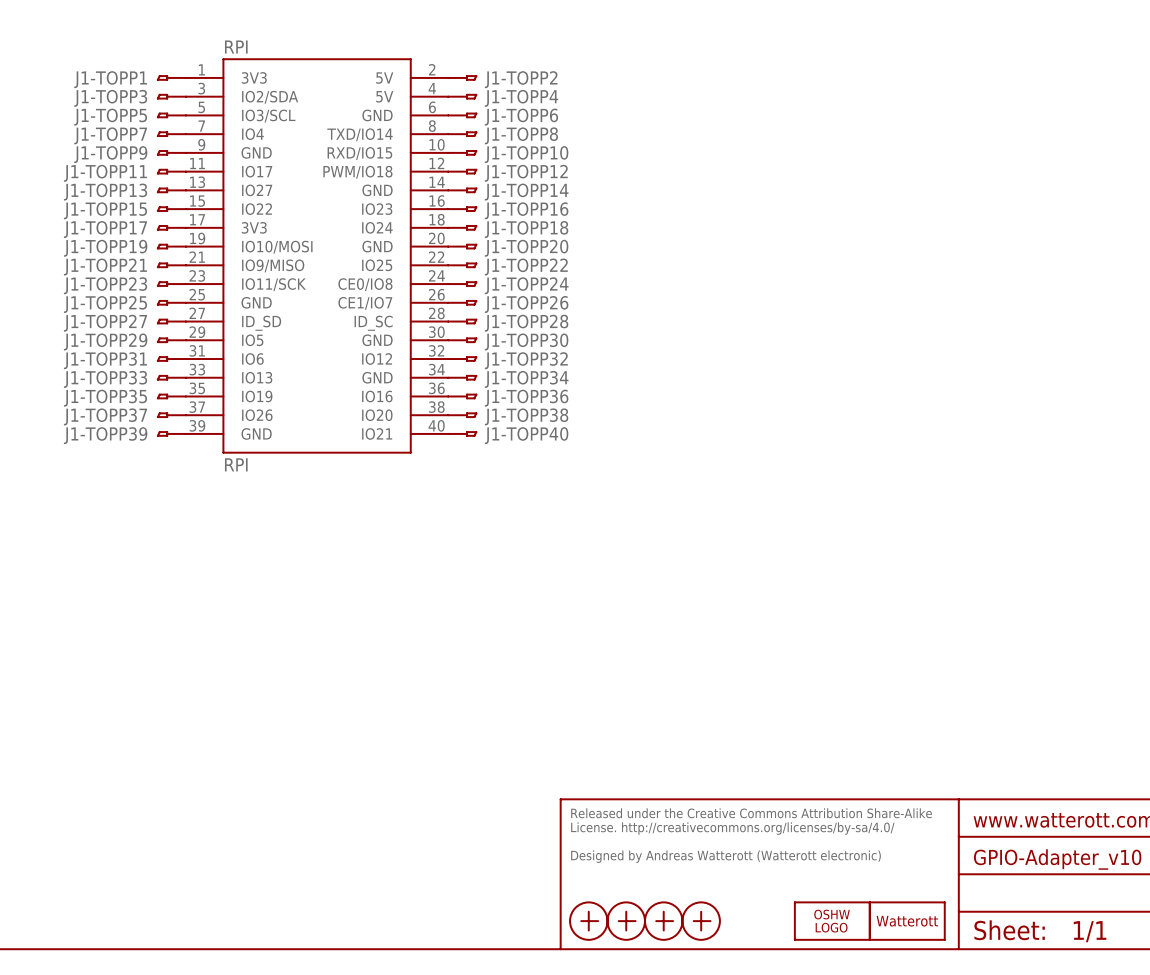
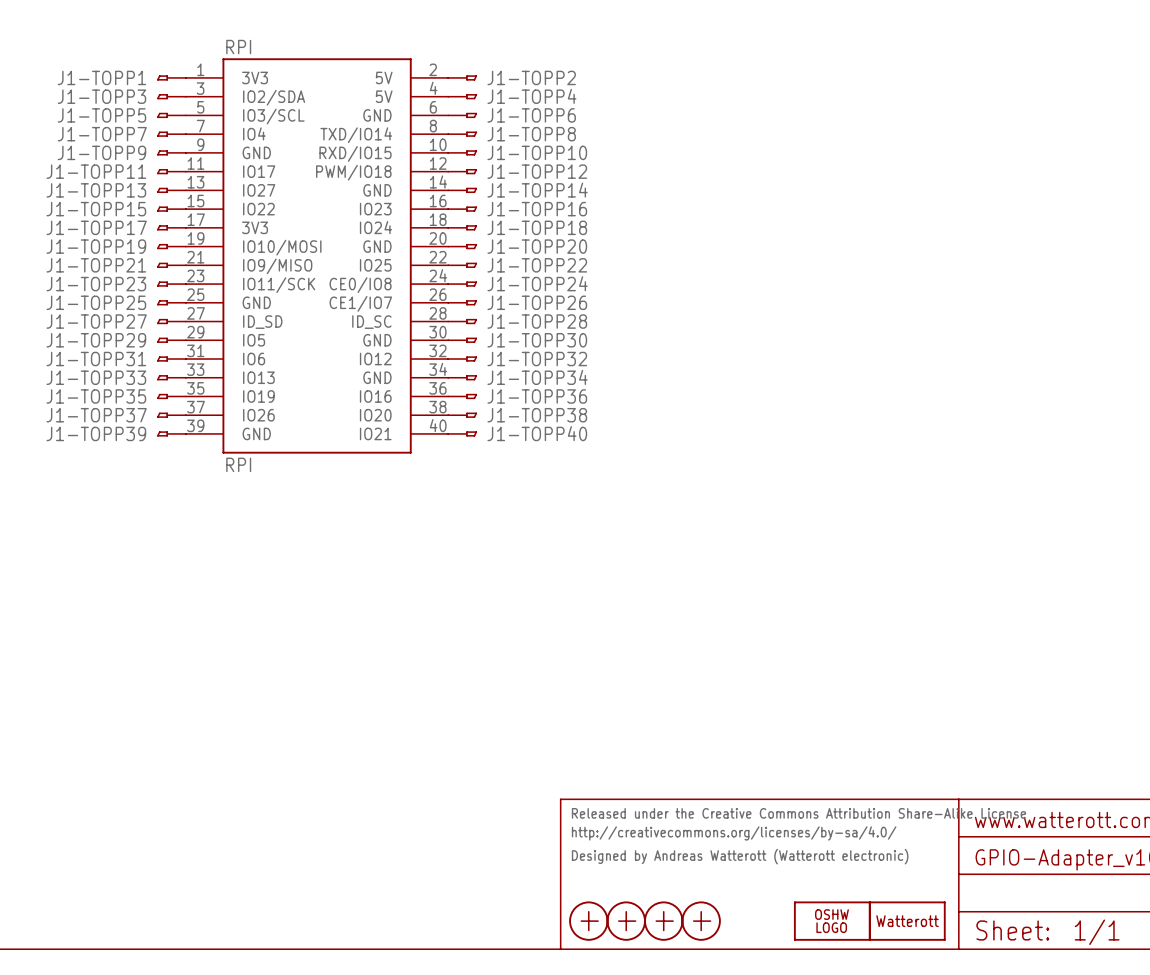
text: License. http://creativecommons.org/licenses/by-sa/4.0/ (732, 828) -> Released under the Creative Commons Attribution Share-Alike License (798, 813)
text: none -> http://creativecommons.org/licenses/by-sa/4.0/ (734, 833)

